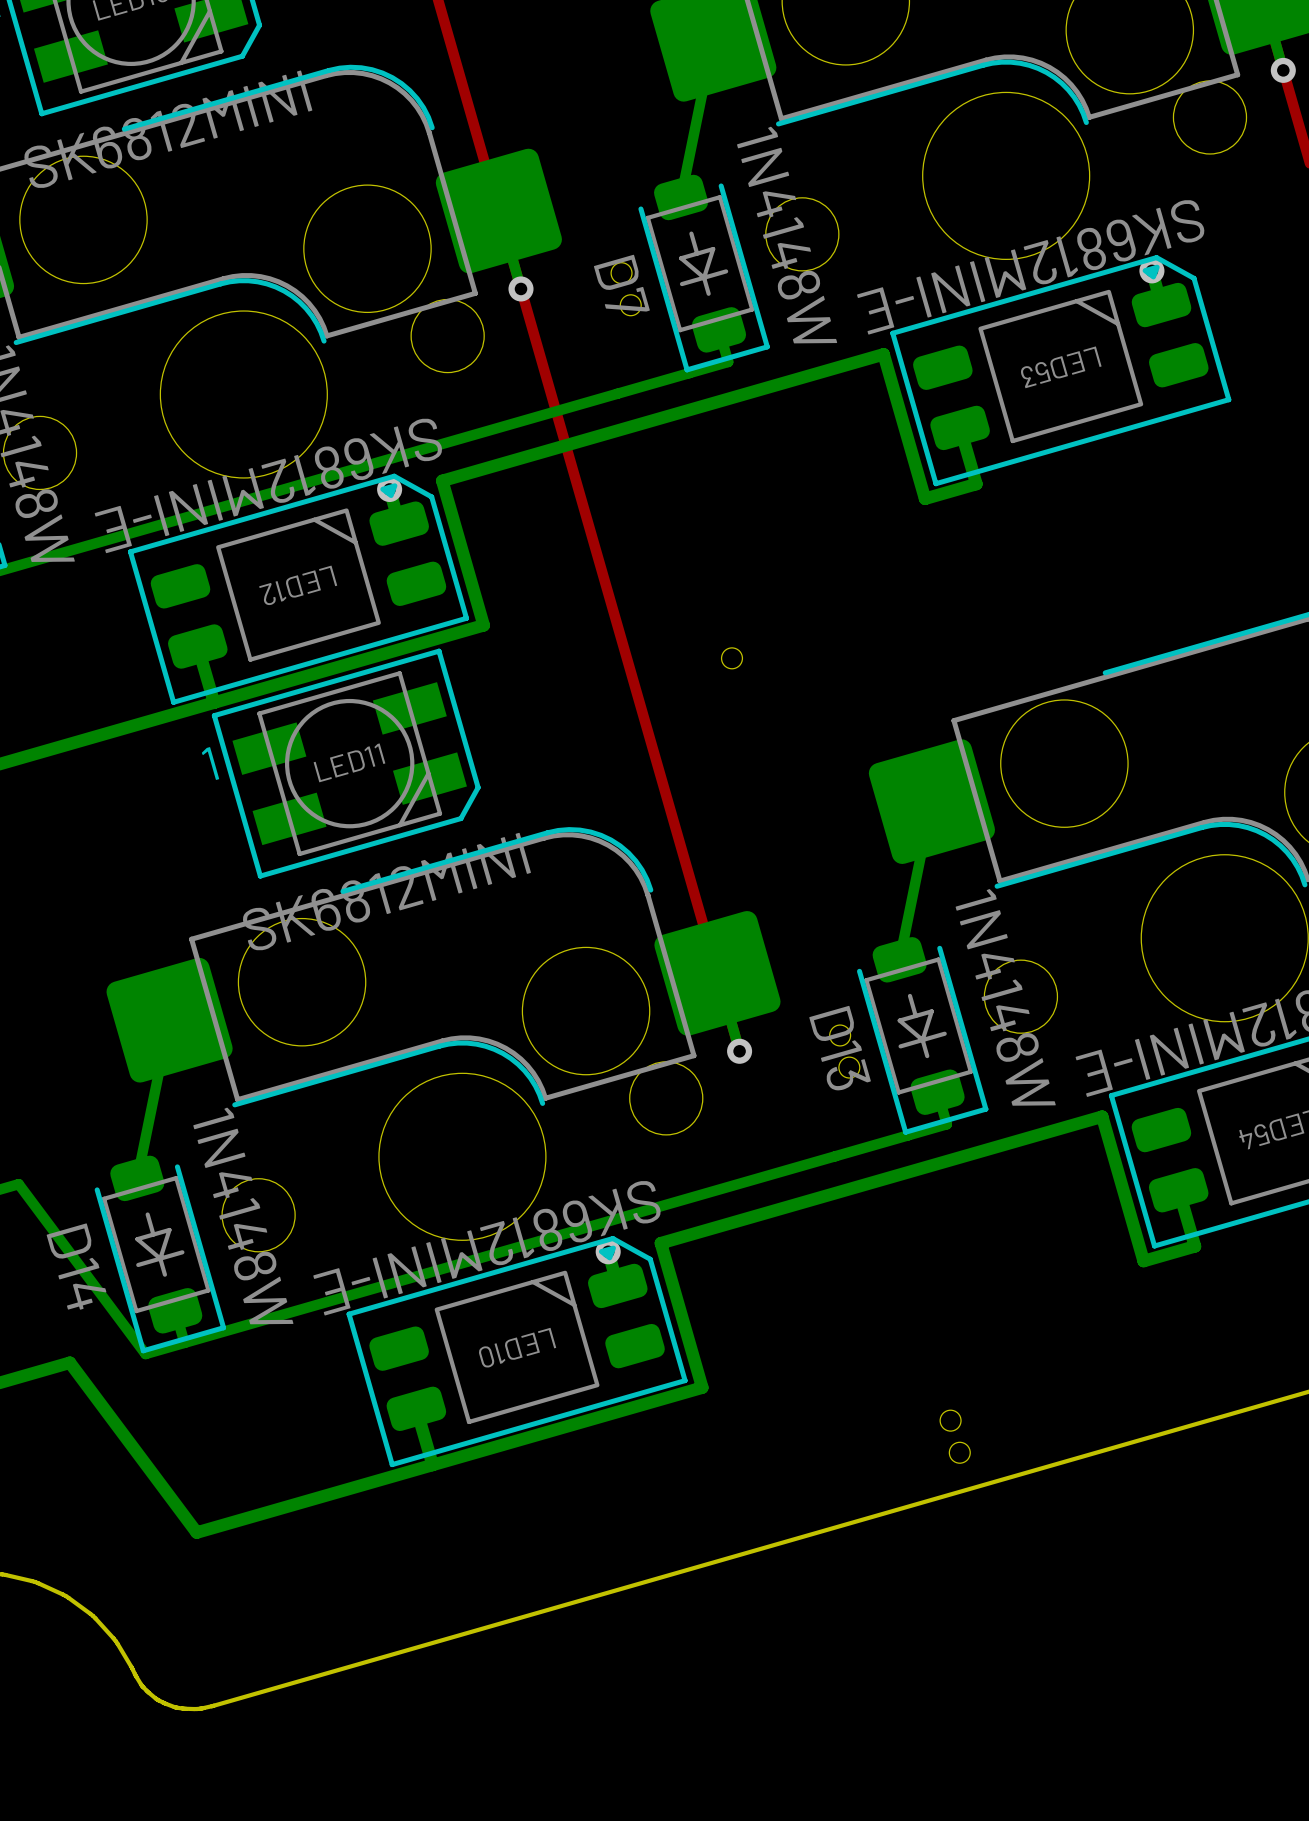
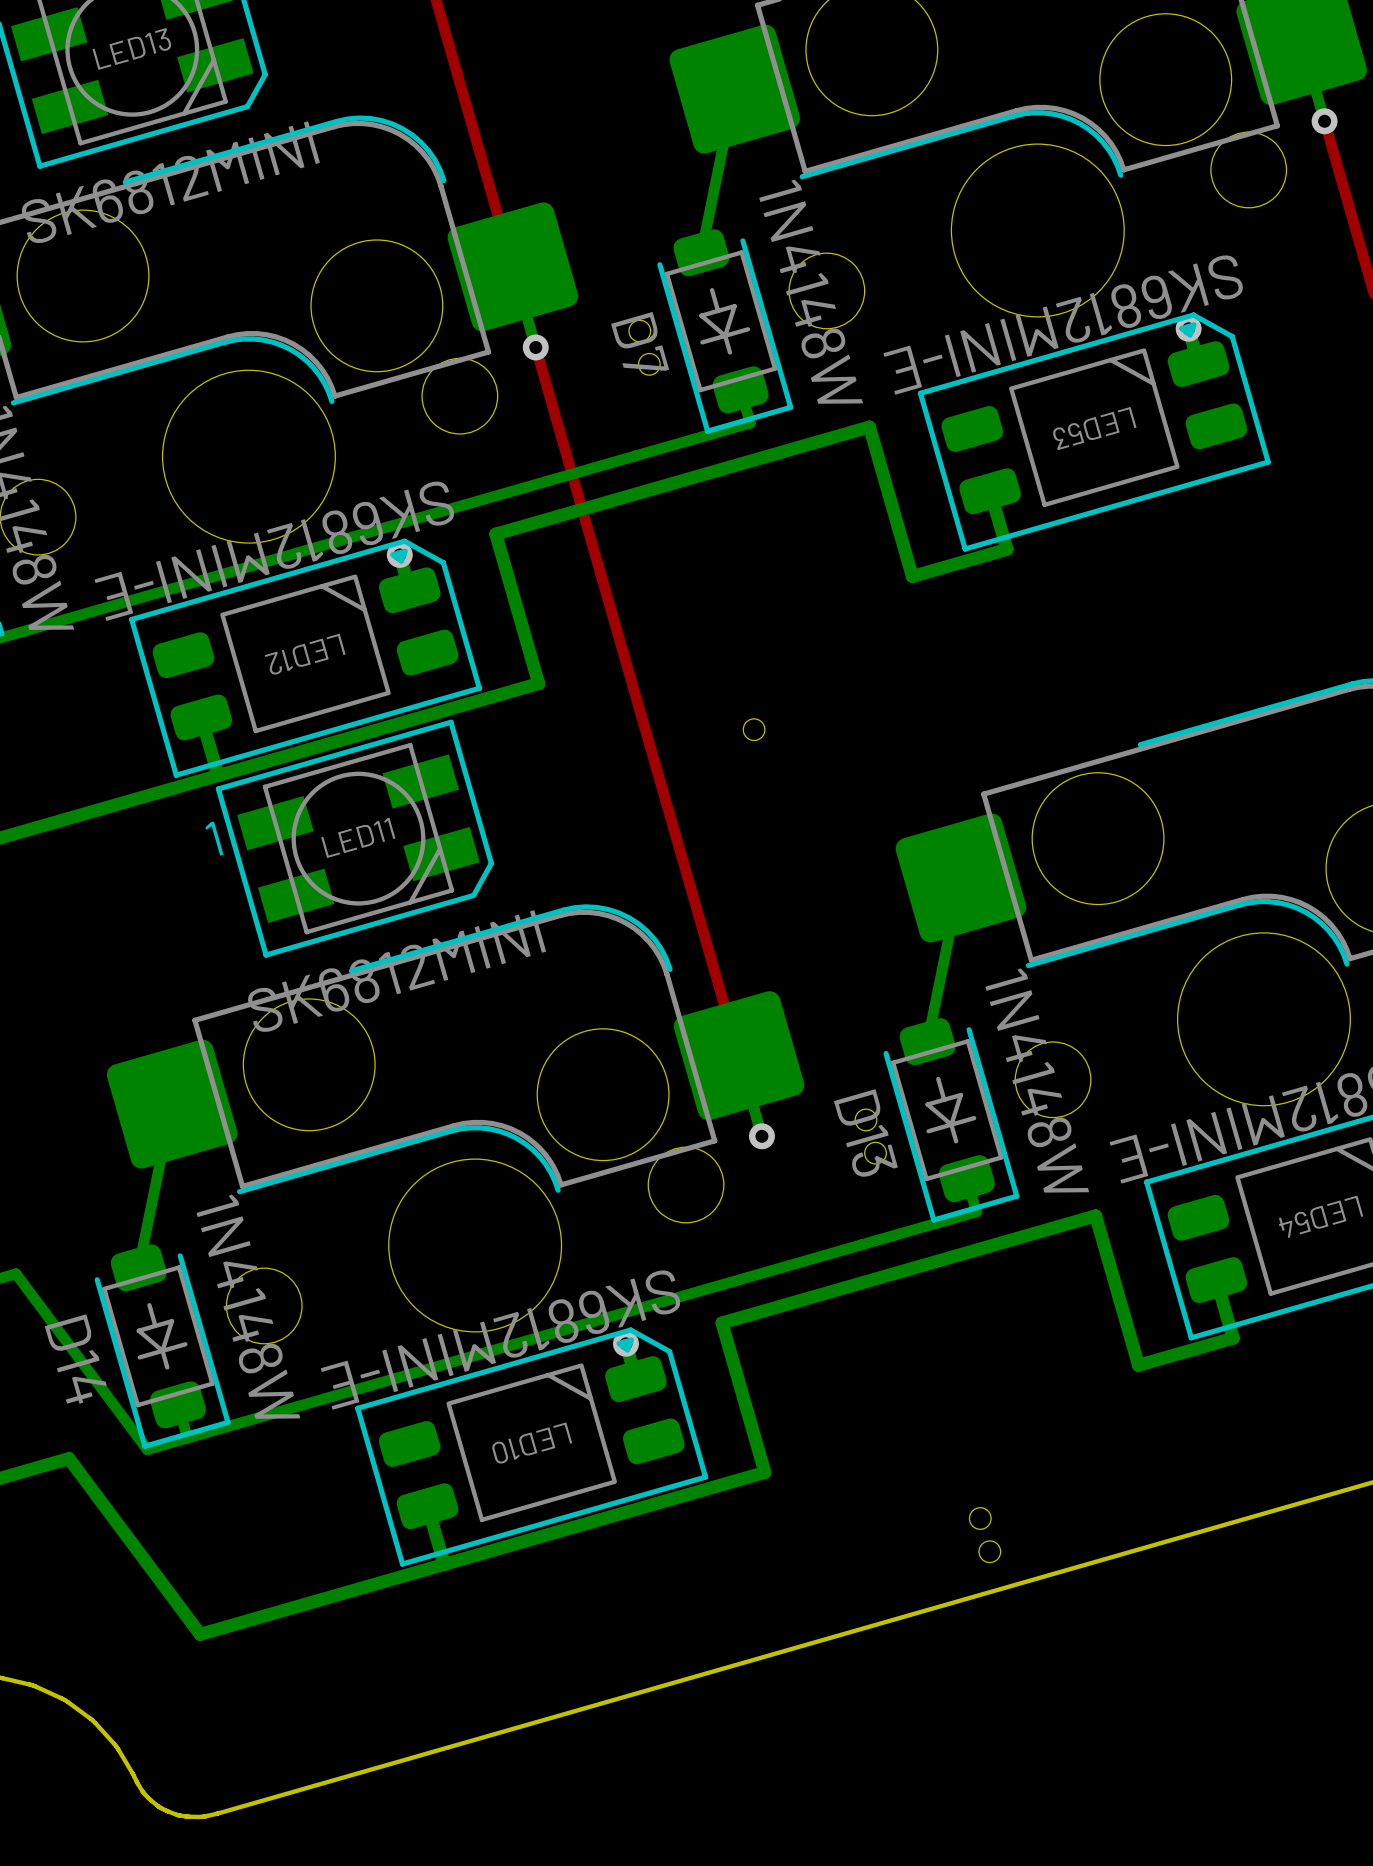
bottom track: (843, 365) (883, 354) (925, 498) -> (869, 427) (912, 576) (953, 564)
bottom track: (482, 469) (442, 480) (483, 625) -> (495, 534) (538, 683) (497, 695)
bottom track: (1062, 1128) (1102, 1116) (1143, 1261) -> (1095, 1215) (1138, 1365) (1180, 1353)
bottom track: (701, 1231) (660, 1243) (702, 1387) -> (722, 1322) (764, 1472) (723, 1484)

